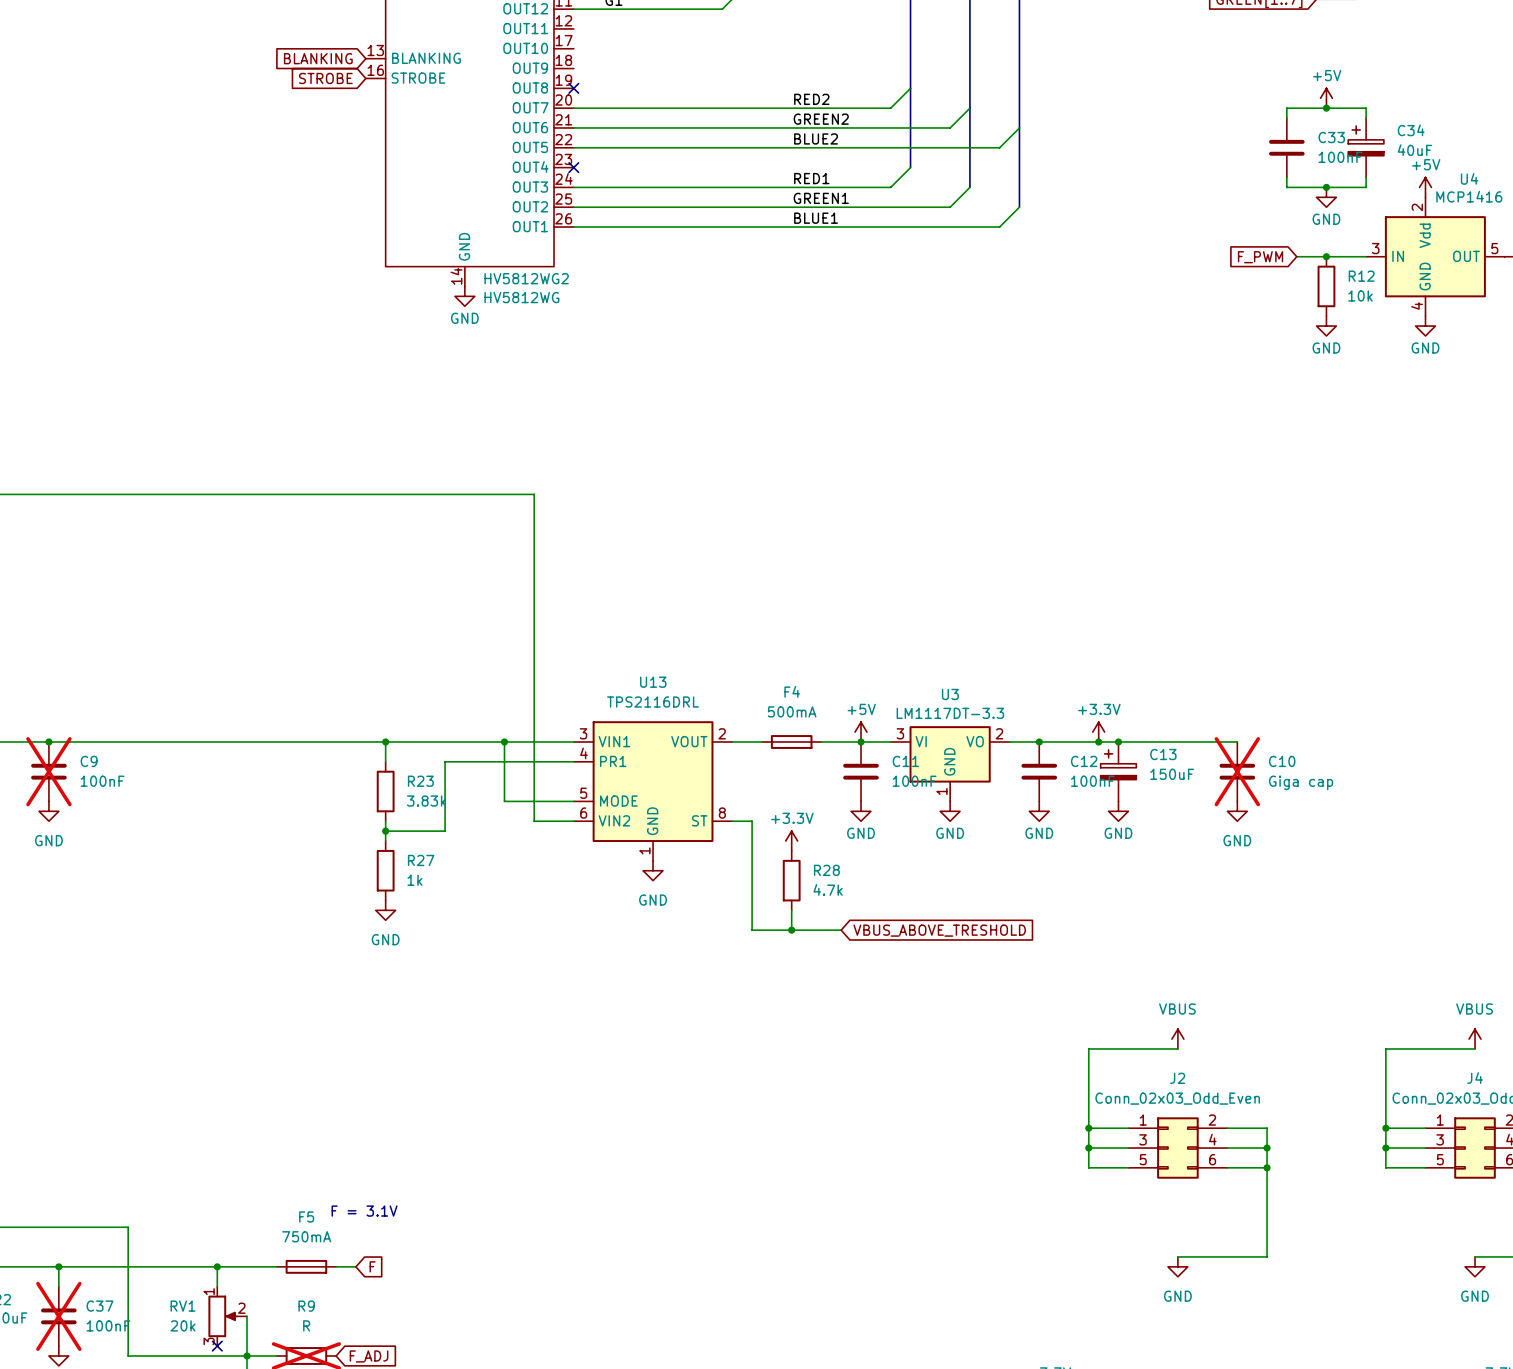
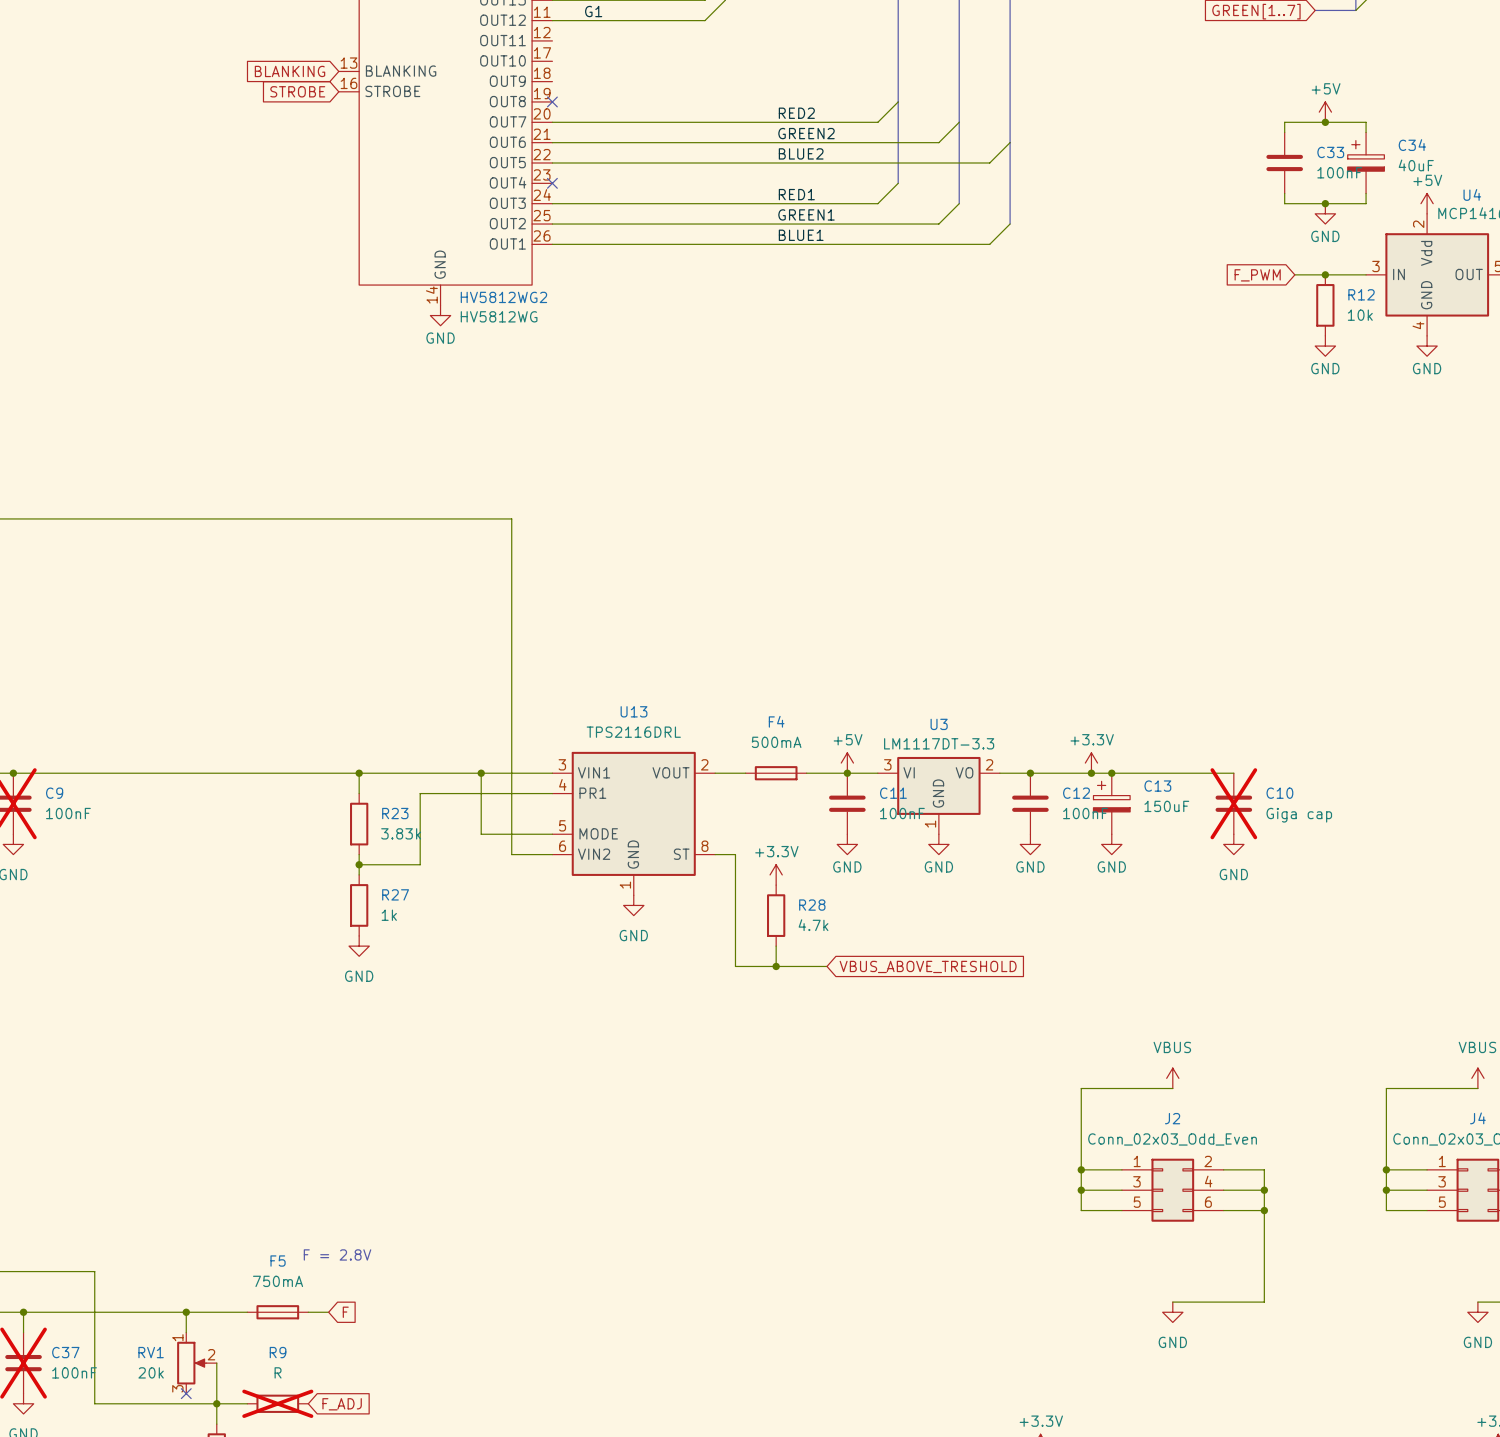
text: F = 3.1V (364, 1211) -> F = 2.8V (337, 1254)

